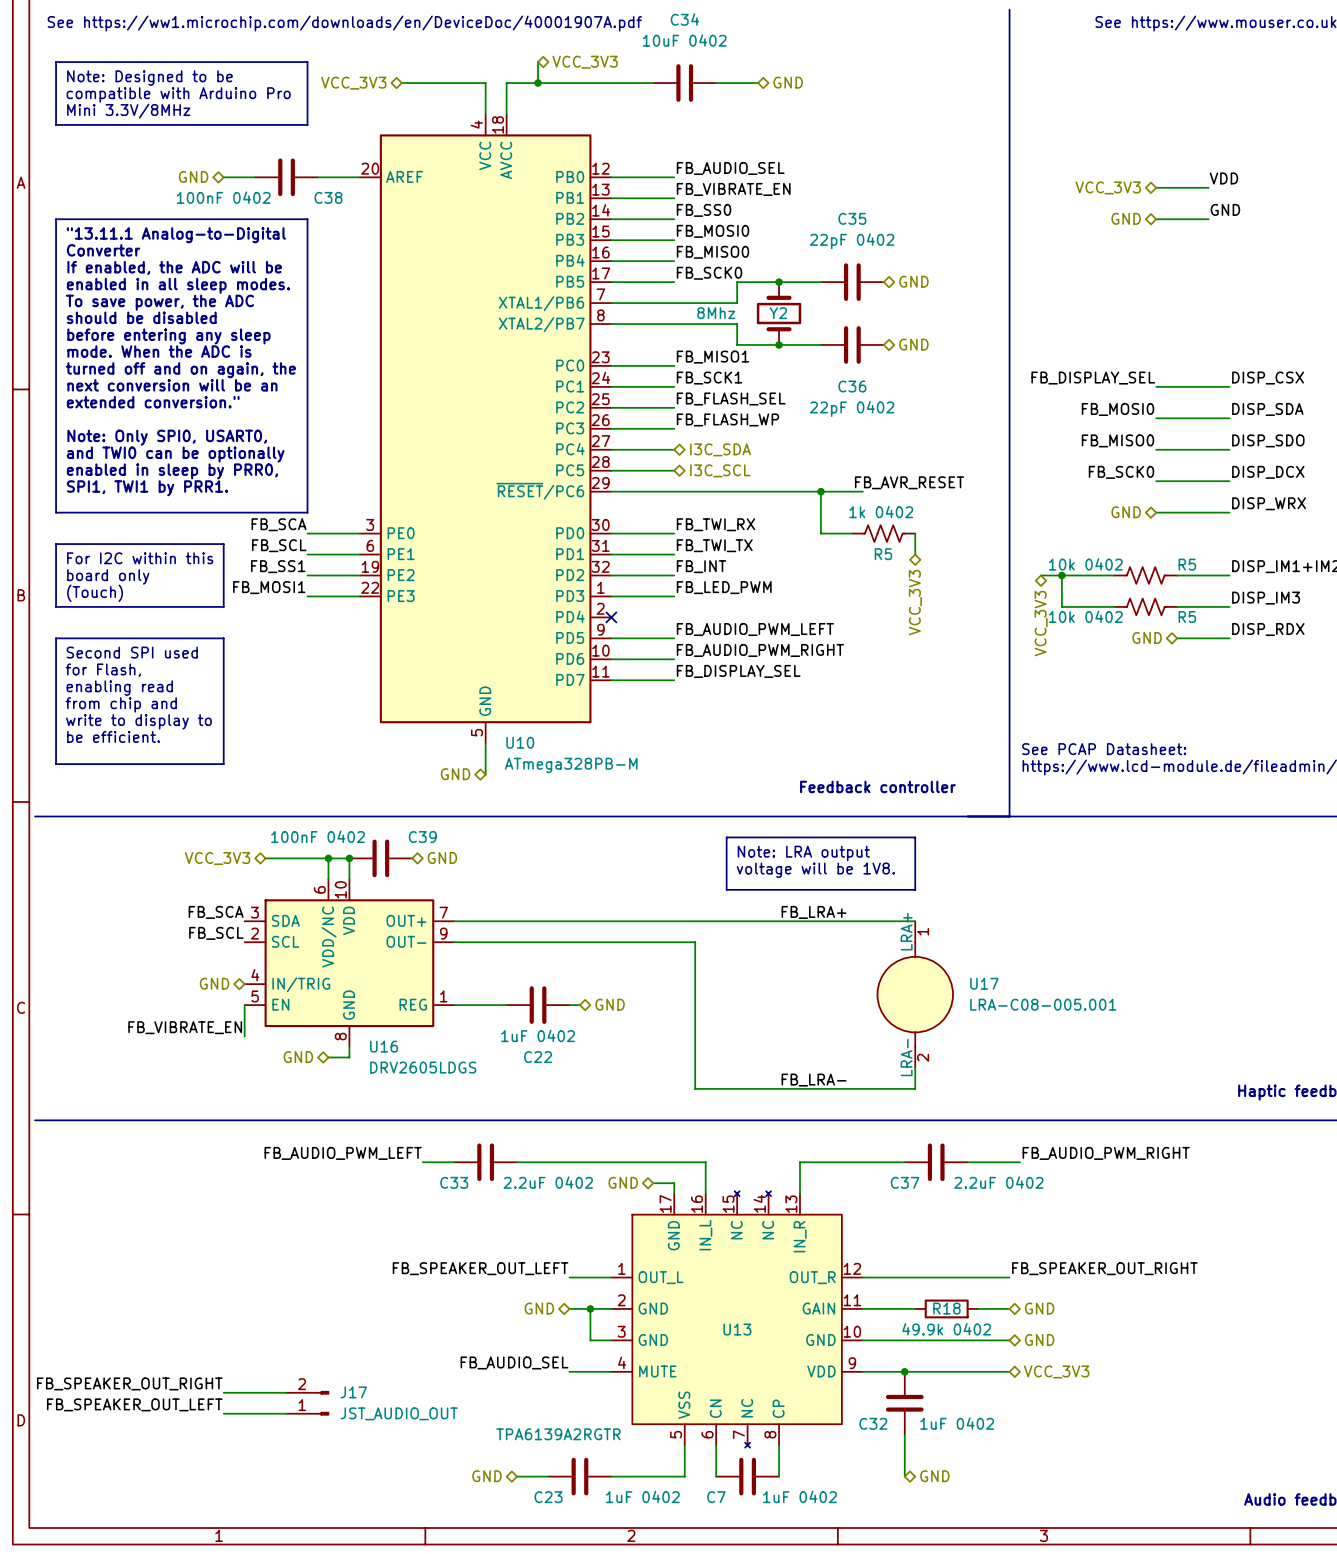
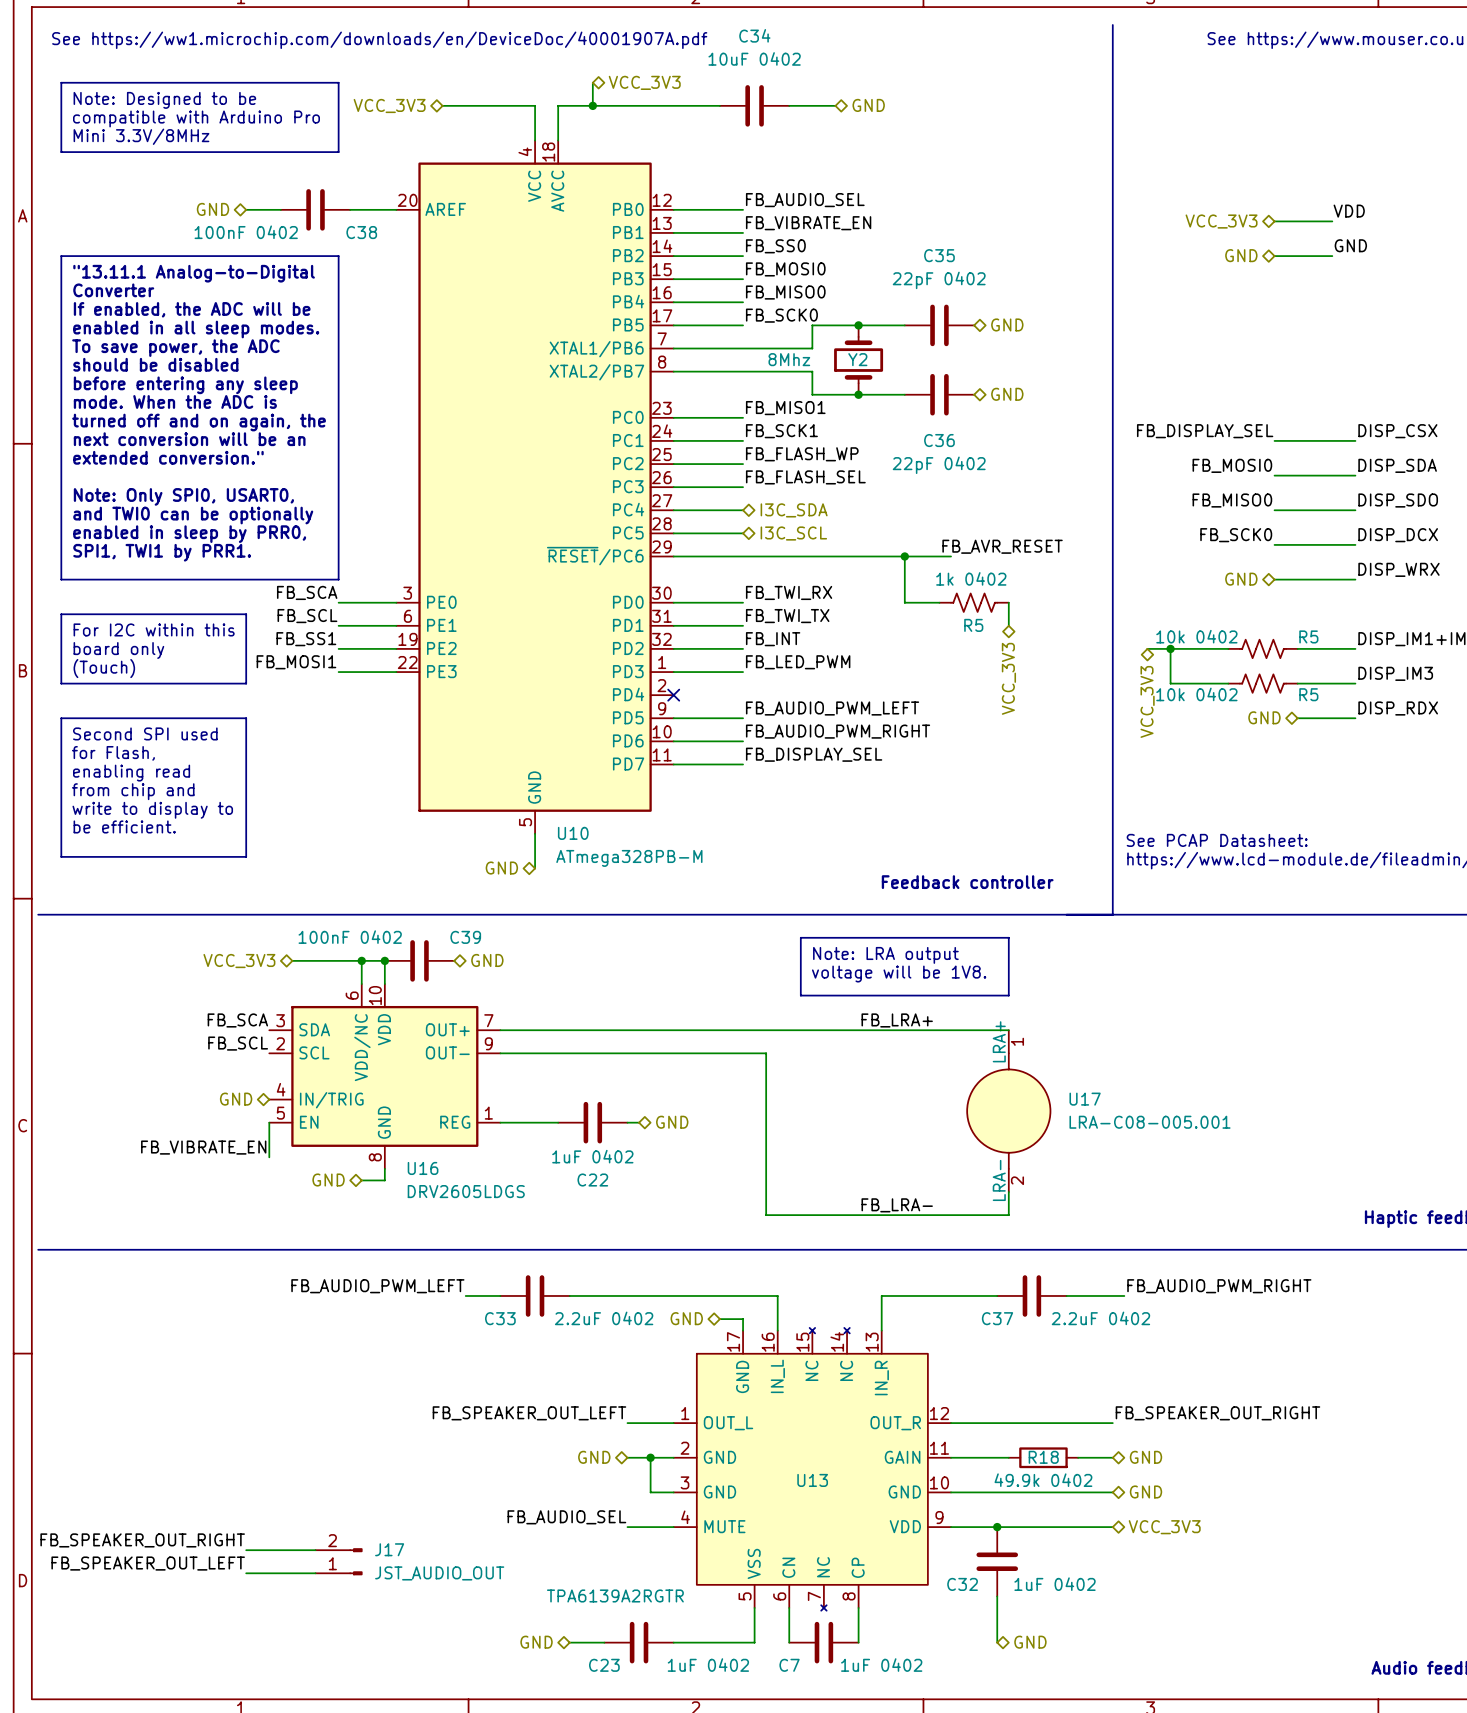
label: FB_FLASH_SEL (731, 398) -> FB_FLASH_WP (802, 454)
label: FB_FLASH_WP (727, 419) -> FB_FLASH_SEL (805, 477)

